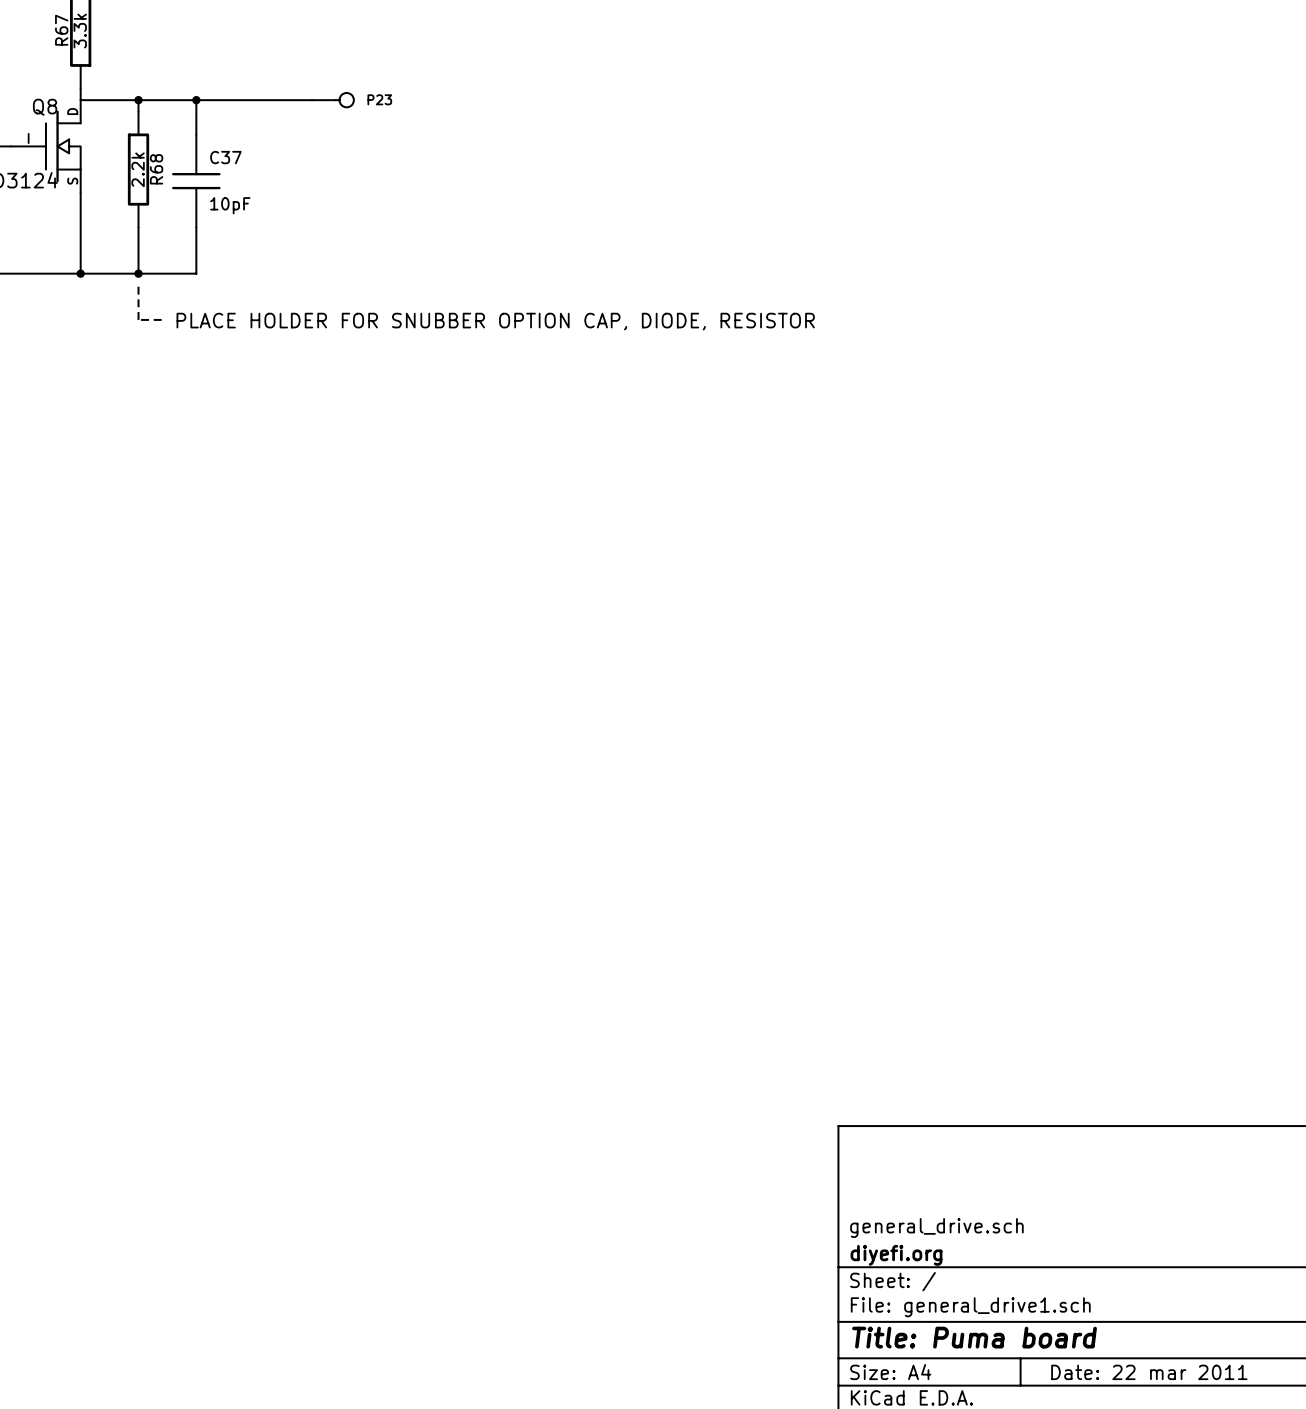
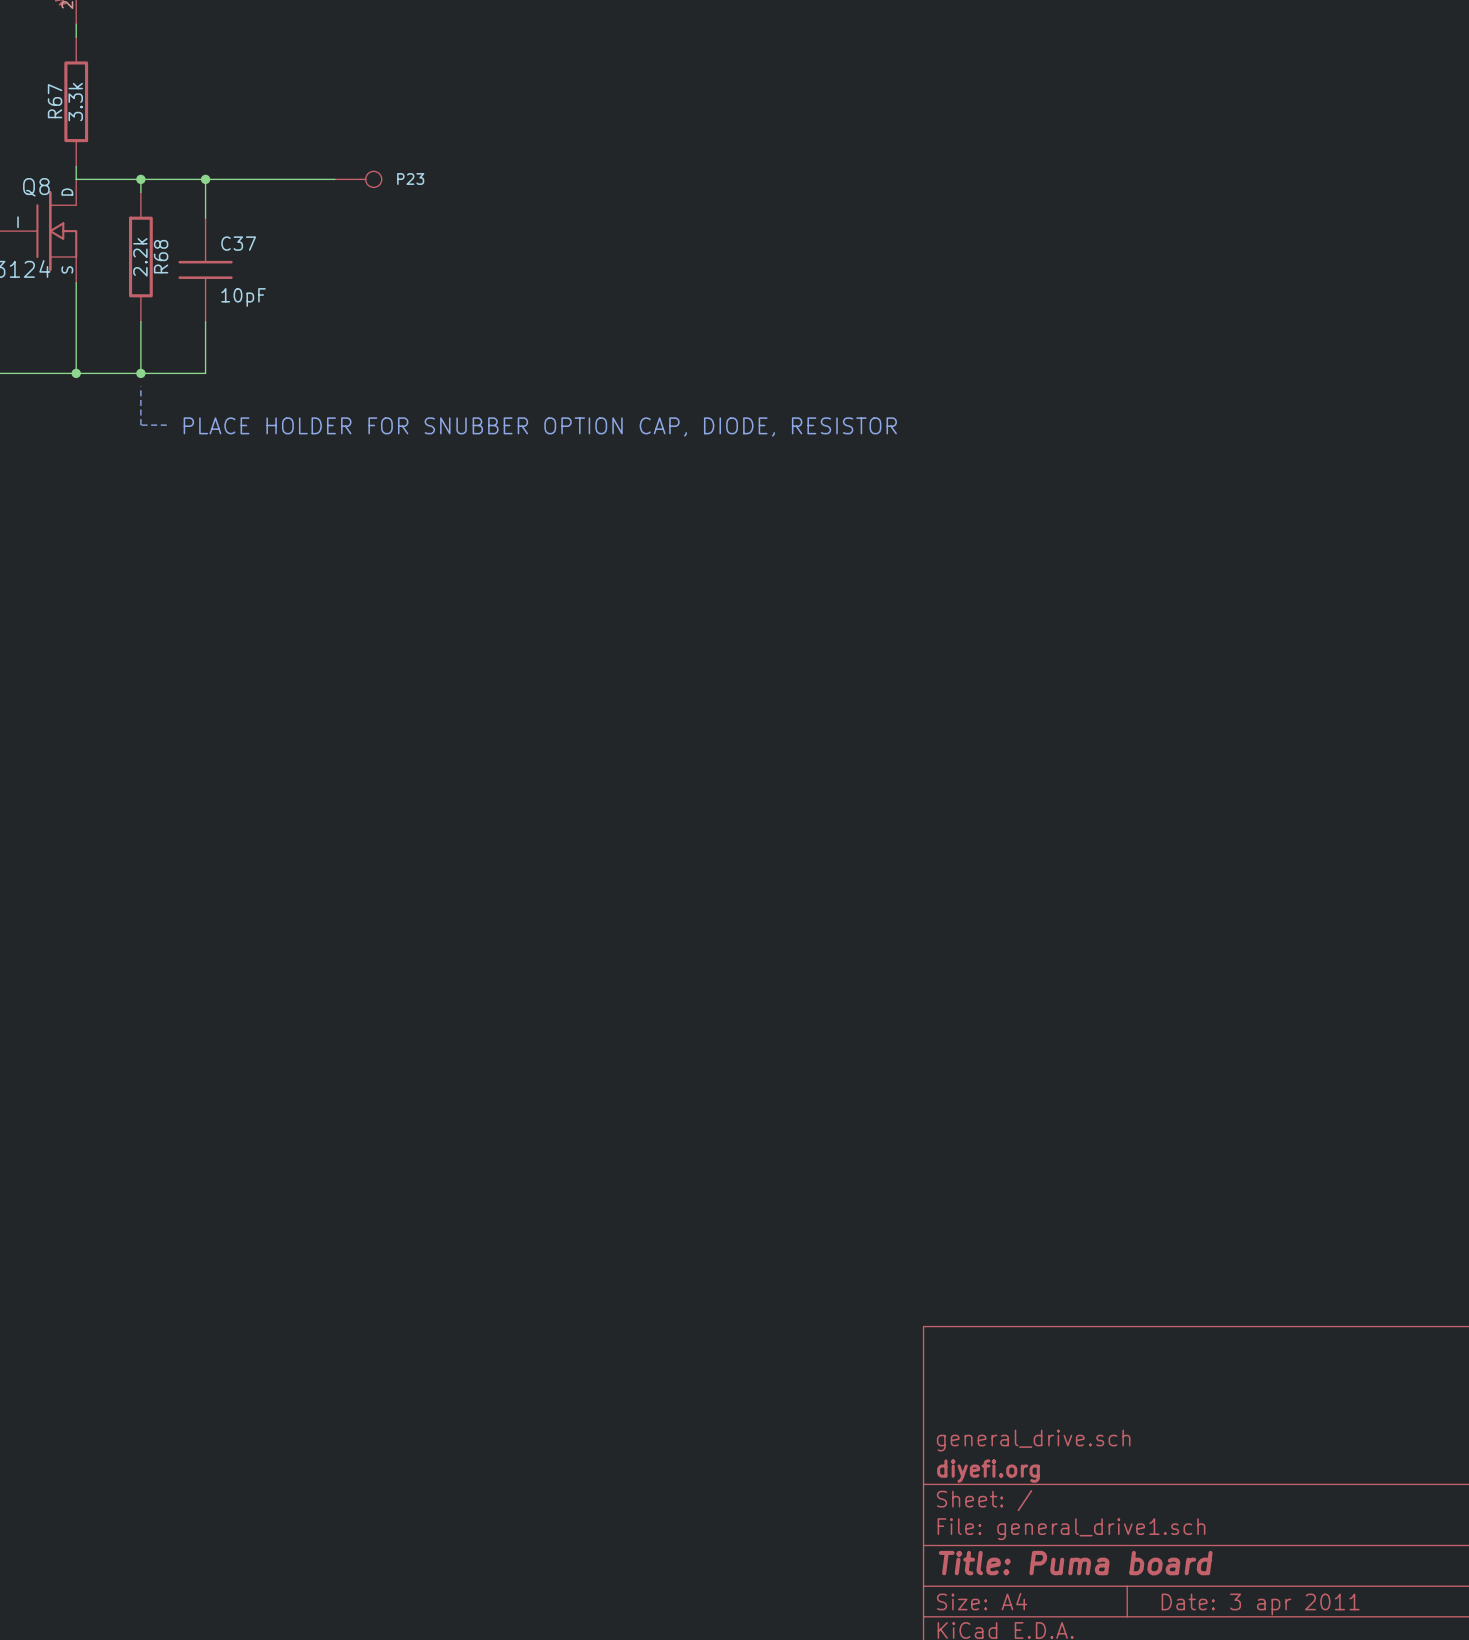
title block: Date: 22 mar 2011 (1149, 1372) -> Date: 3 apr 2011 (1260, 1604)

